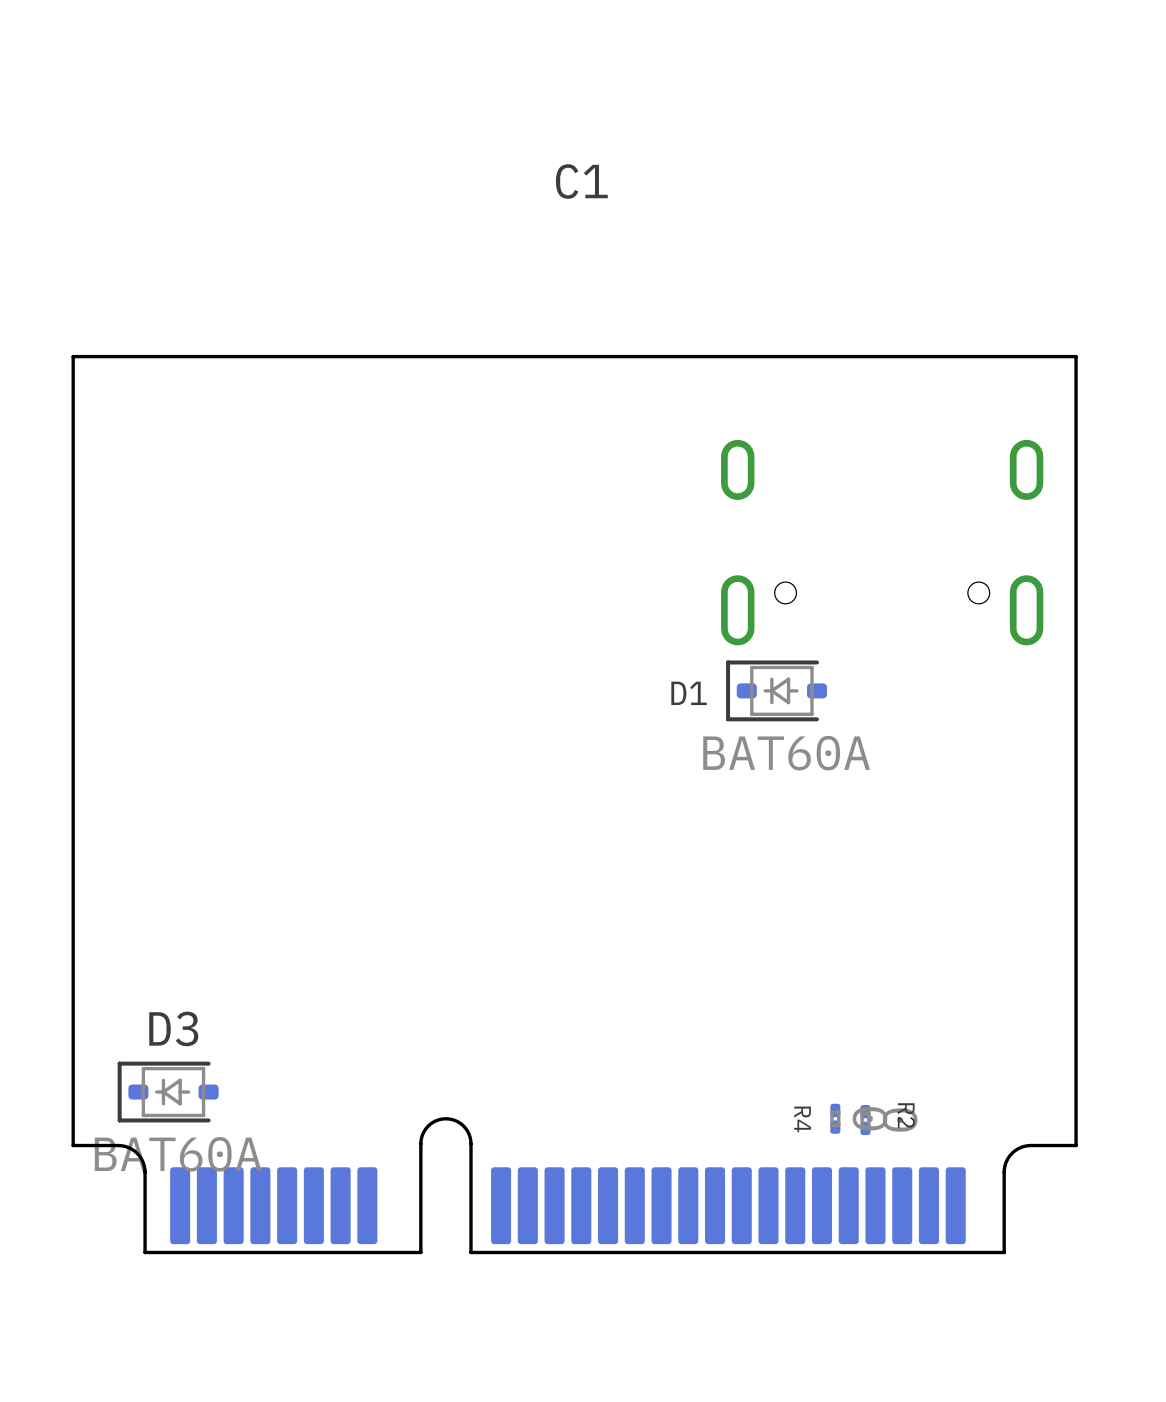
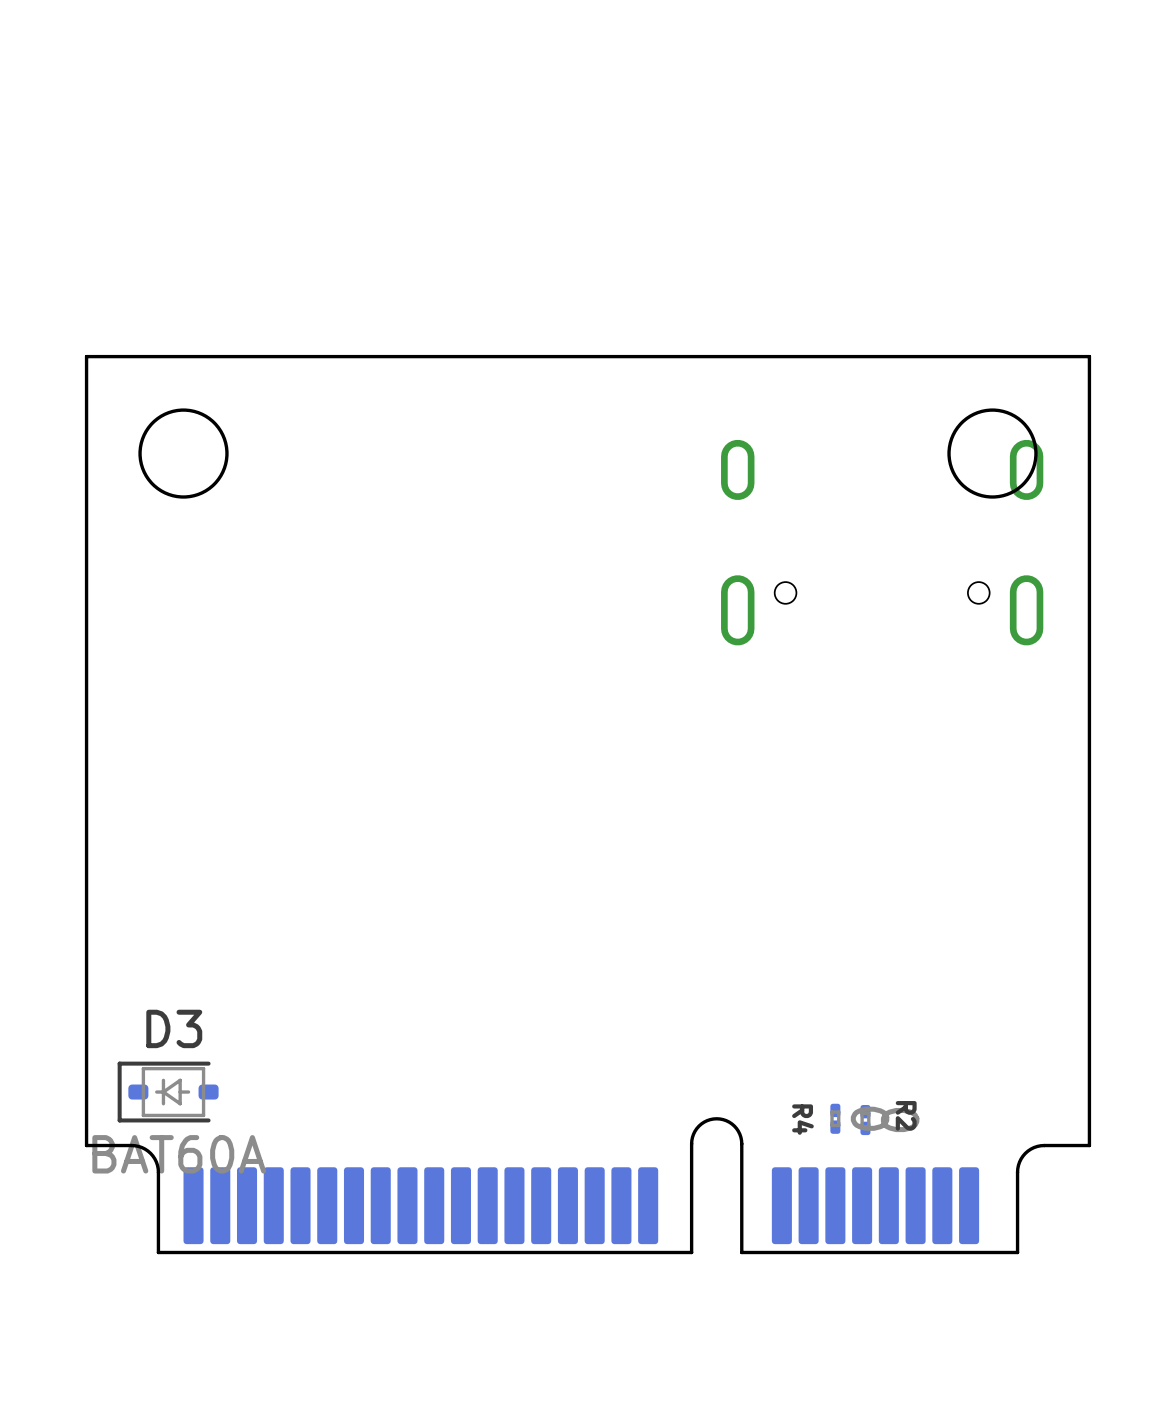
D1: BAT60A (776, 690) -> none
C1 side: bottom (574, 804) -> top (587, 804)

